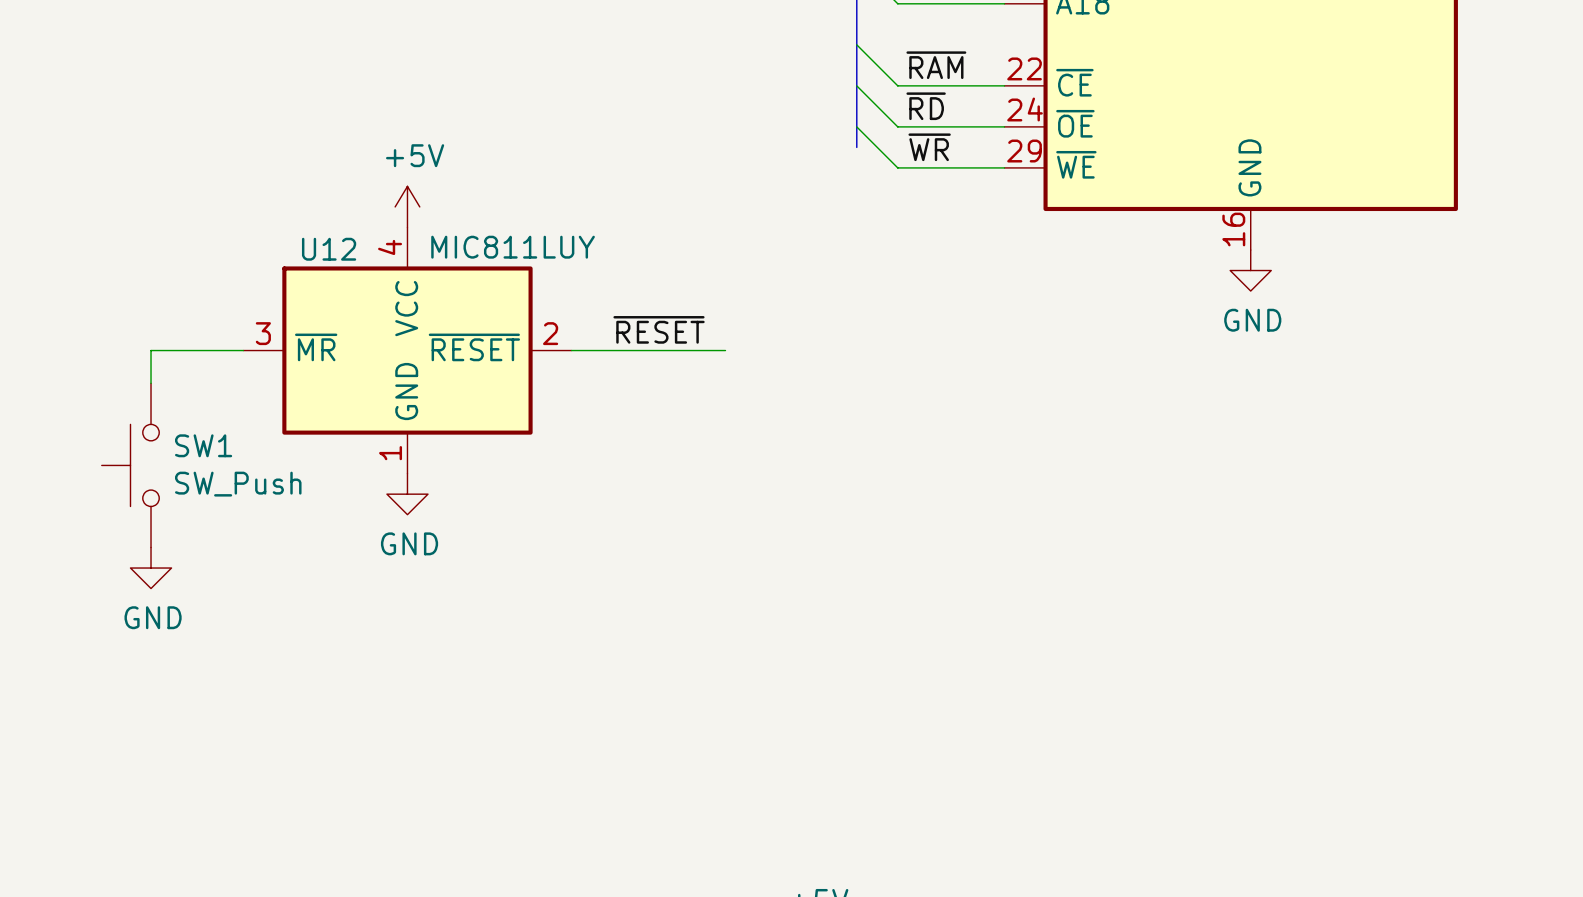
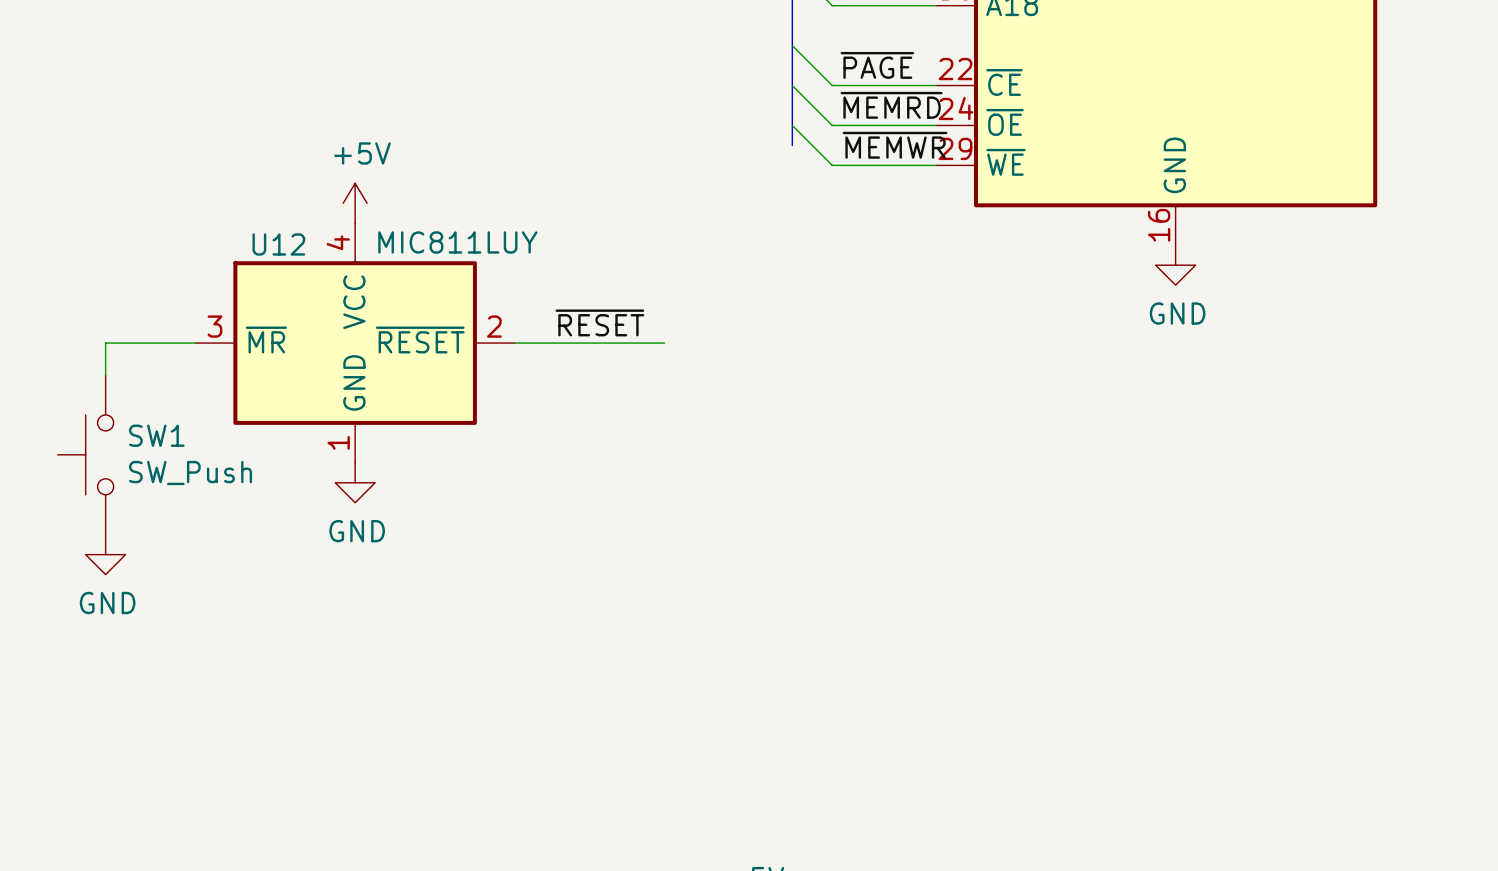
label: ~{RAM} (936, 65) -> ~{PAGE} (877, 65)
label: ~{RD} (926, 106) -> ~{MEMRD} (891, 105)
label: ~{WR} (929, 147) -> ~{MEMWR} (895, 145)

